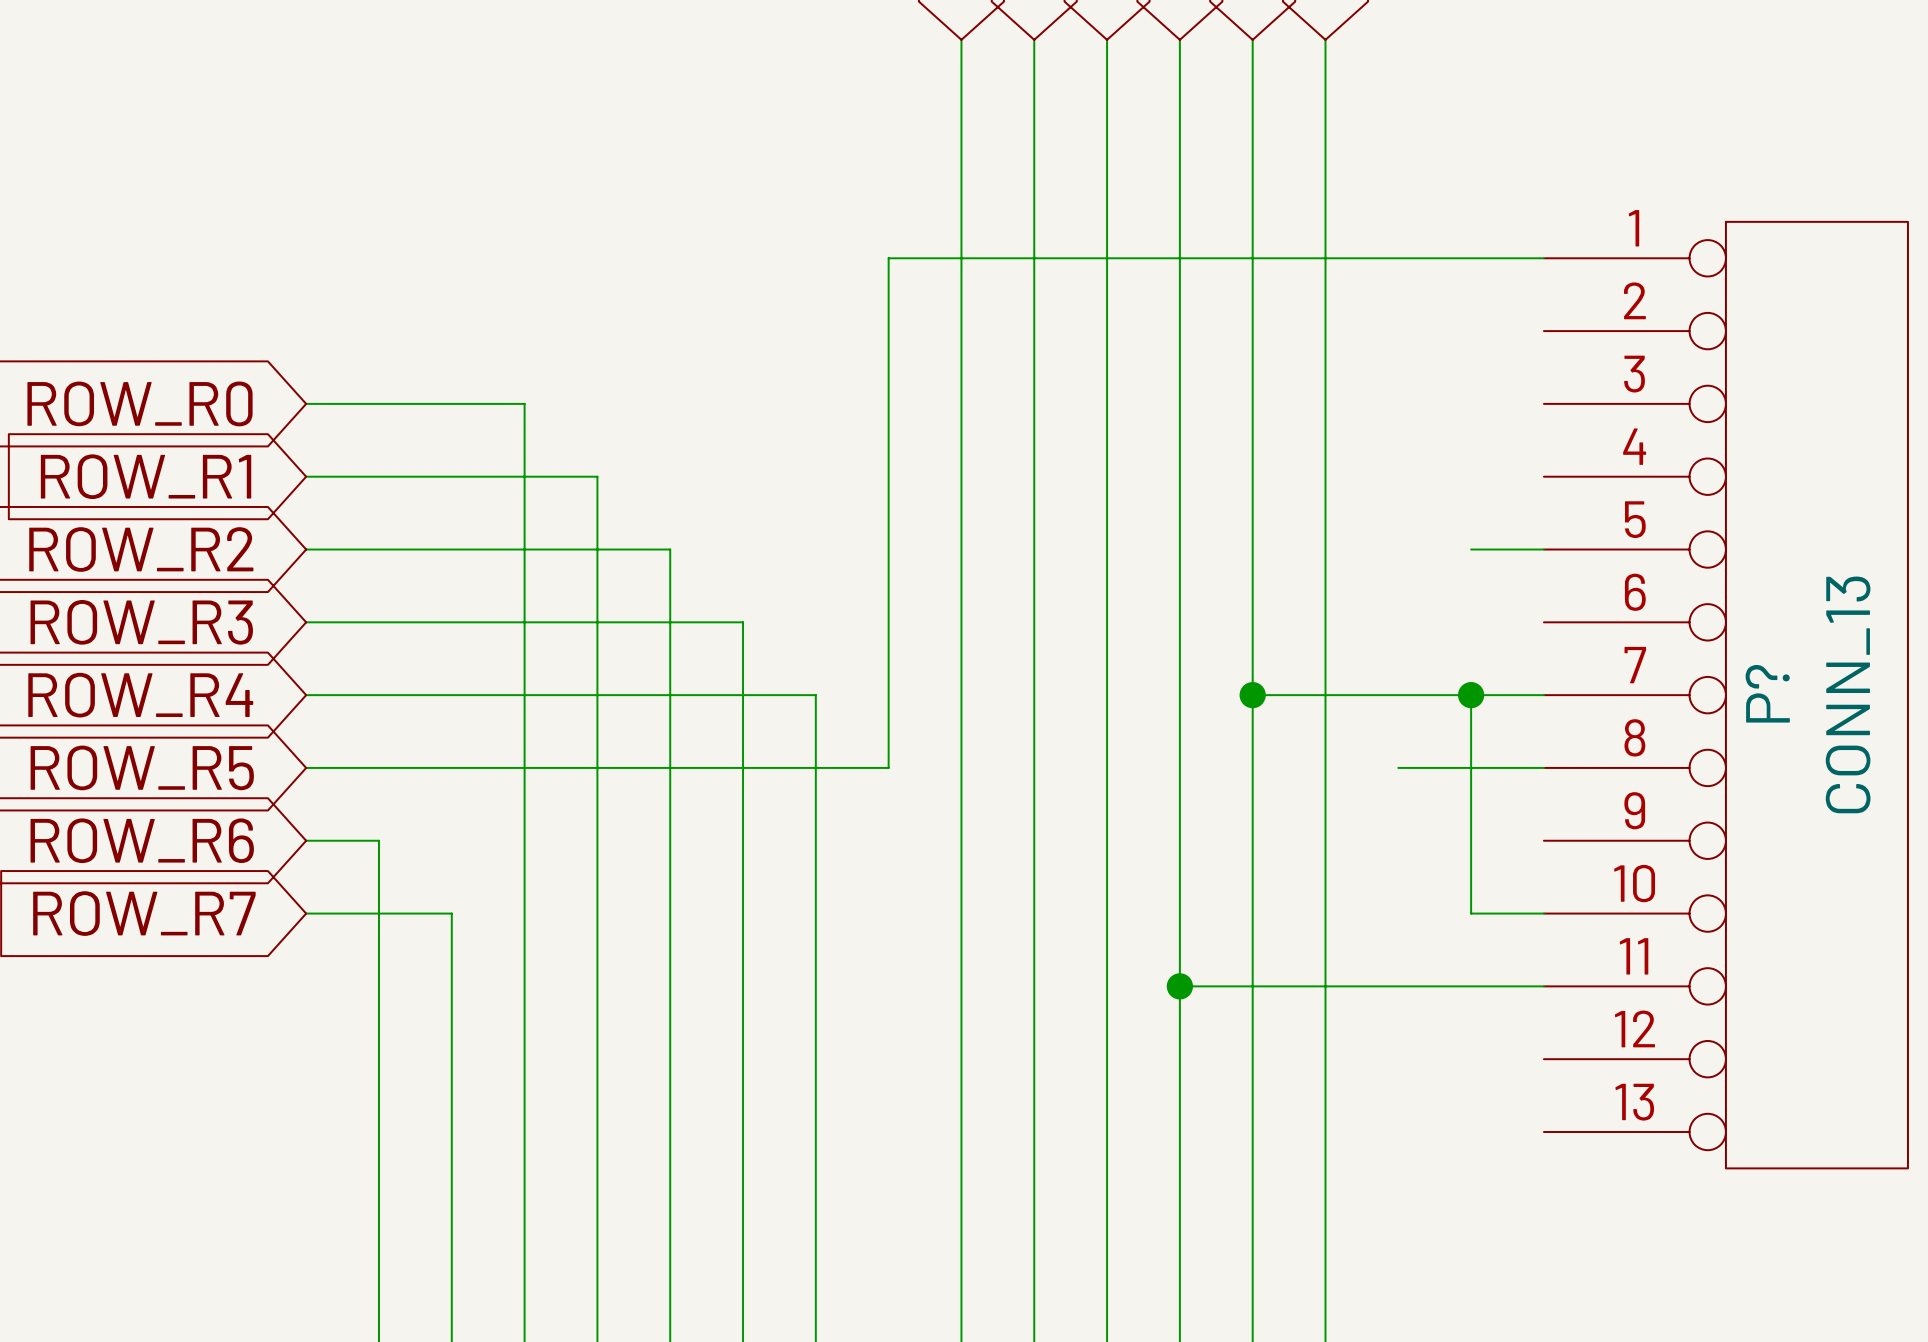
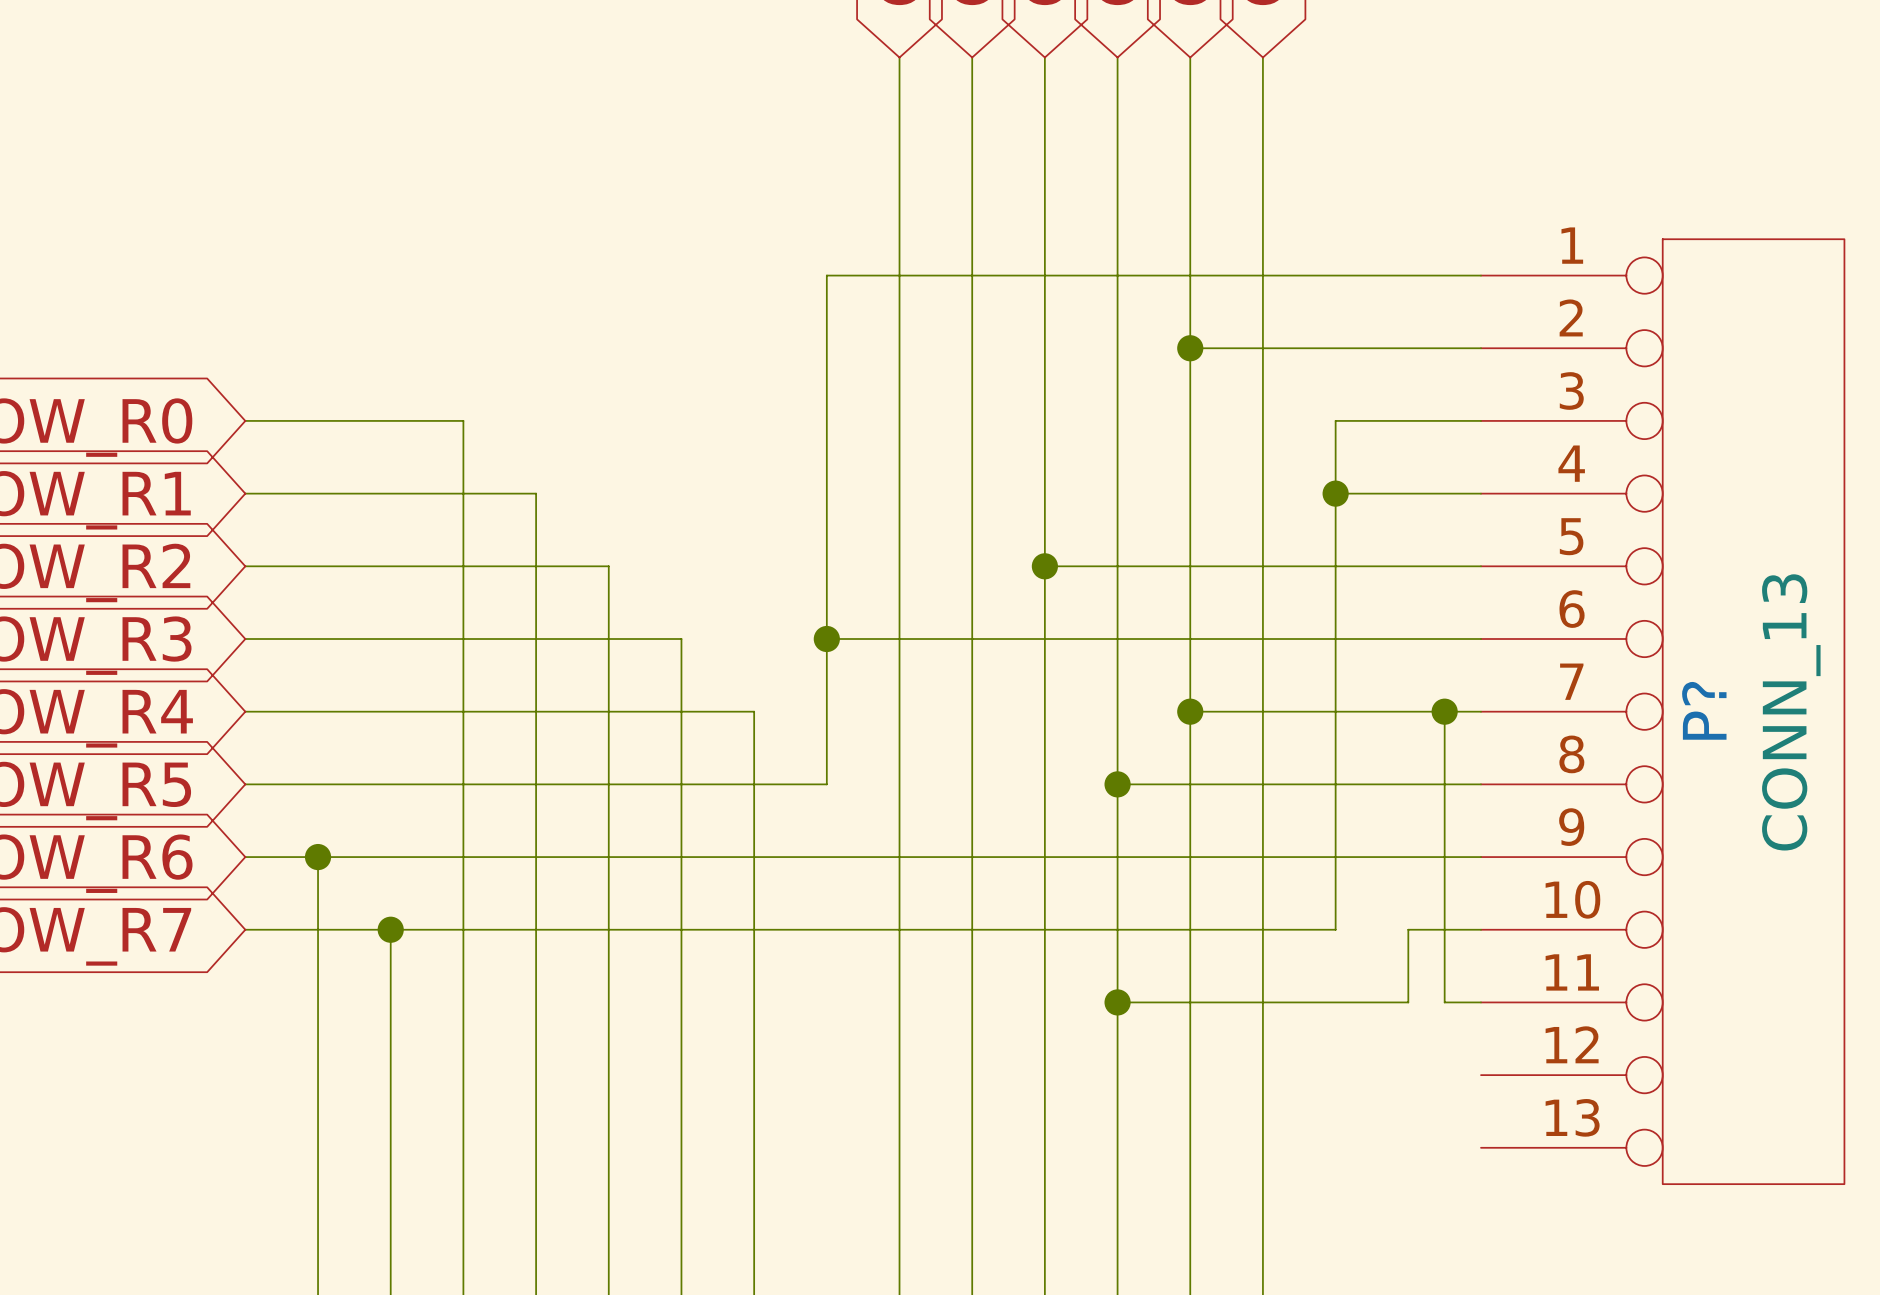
wire: none -> (1190, 348) (1481, 348)
junction: none -> (1190, 348)
wire: none -> (1481, 420) (1335, 420) (1335, 929) (390, 929)
wire: none -> (1335, 493) (1481, 493)
junction: none -> (1335, 493)
wire: none -> (1044, 566) (1408, 566)
junction: none -> (1044, 566)
wire: none -> (826, 639) (1481, 639)
junction: none -> (826, 639)
wire: (1471, 695) (1471, 913) -> none
junction position: (1471, 695) -> (1444, 711)
wire: none -> (1444, 711) (1444, 1002)
wire: none -> (1117, 784) (1335, 784)
junction: none -> (1117, 784)
wire: none -> (318, 857) (1481, 857)
junction: none -> (318, 857)
junction: none -> (390, 929)
wire: (1471, 986) (1507, 986) -> (1408, 1002) (1408, 929)

